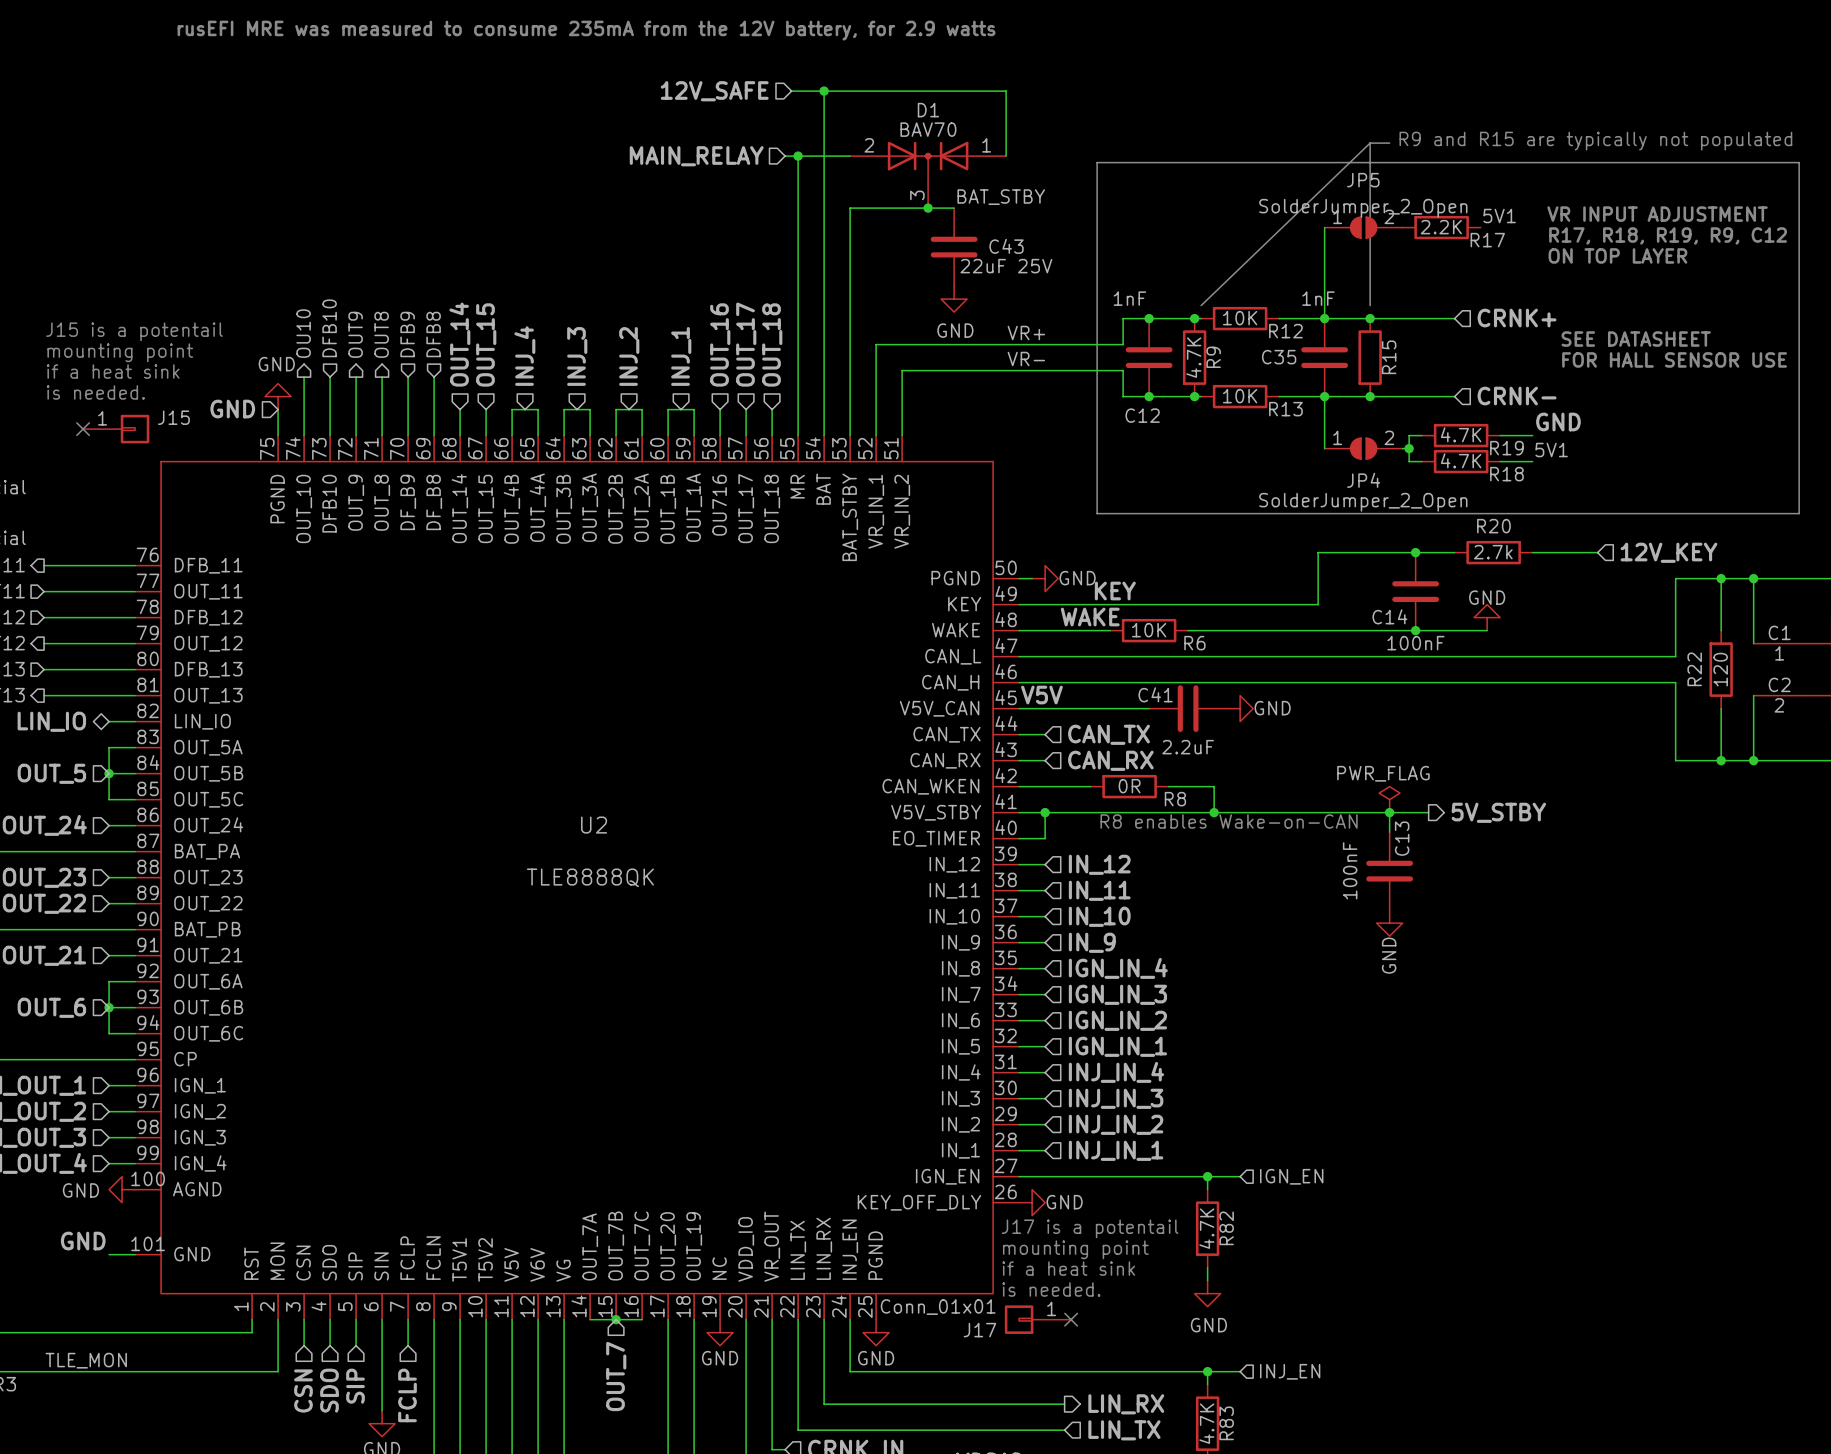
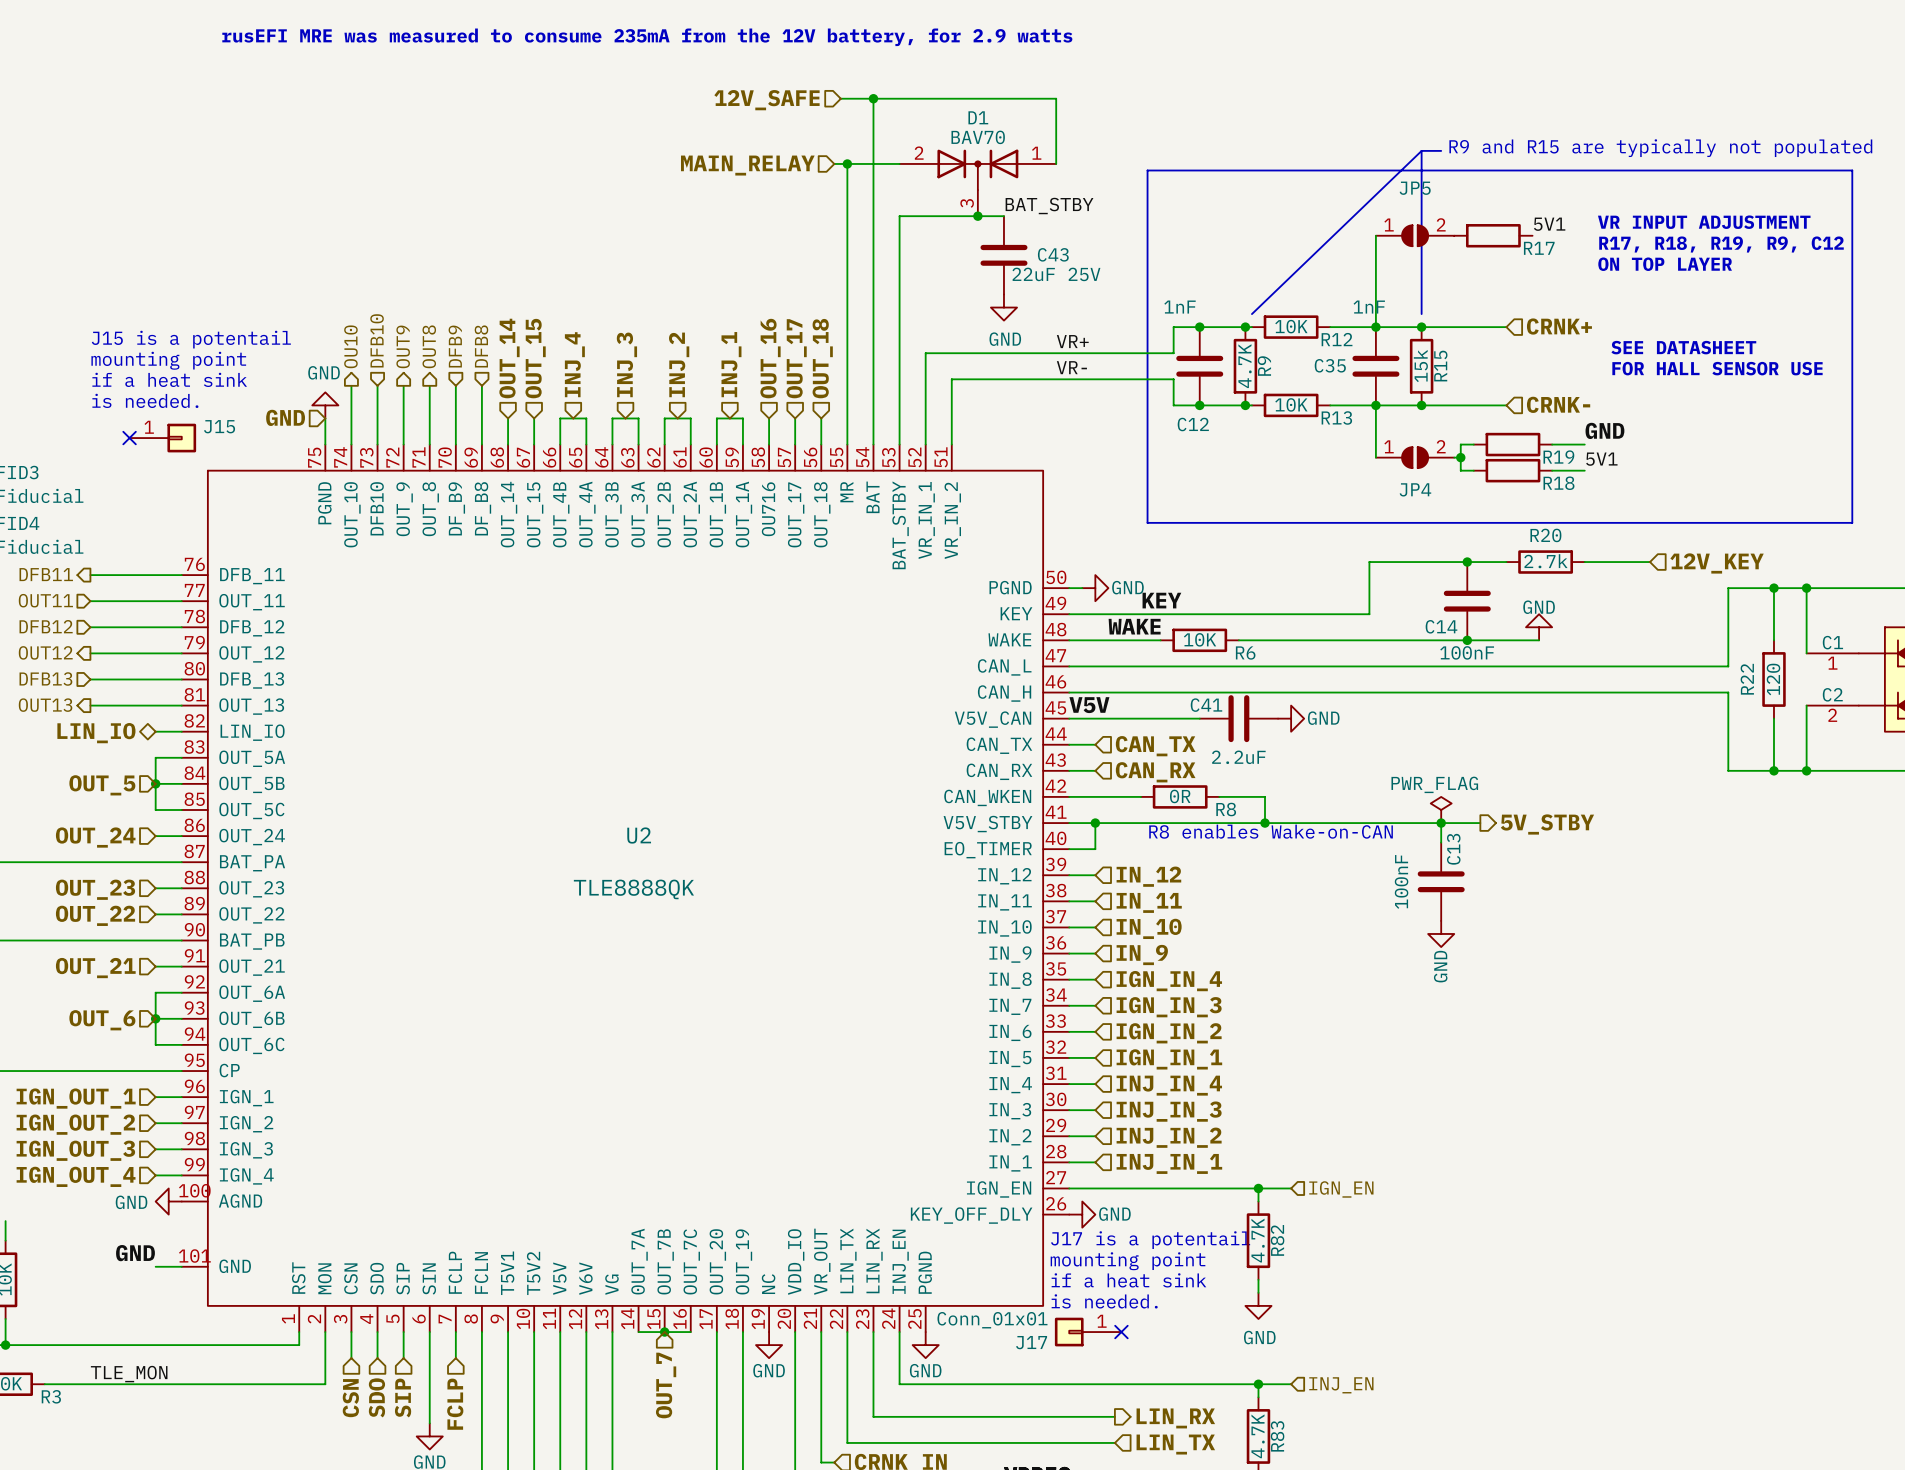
JP5 value: SolderJumper_2_Open (1363, 208) -> none
R17 value: 2.2K (1441, 227) -> none
R15 value: none -> 15k (1420, 366)
R19 value: 4.7K (1461, 434) -> none
R18 value: 4.7K (1461, 460) -> none
JP4 value: SolderJumper_2_Open (1363, 502) -> none

